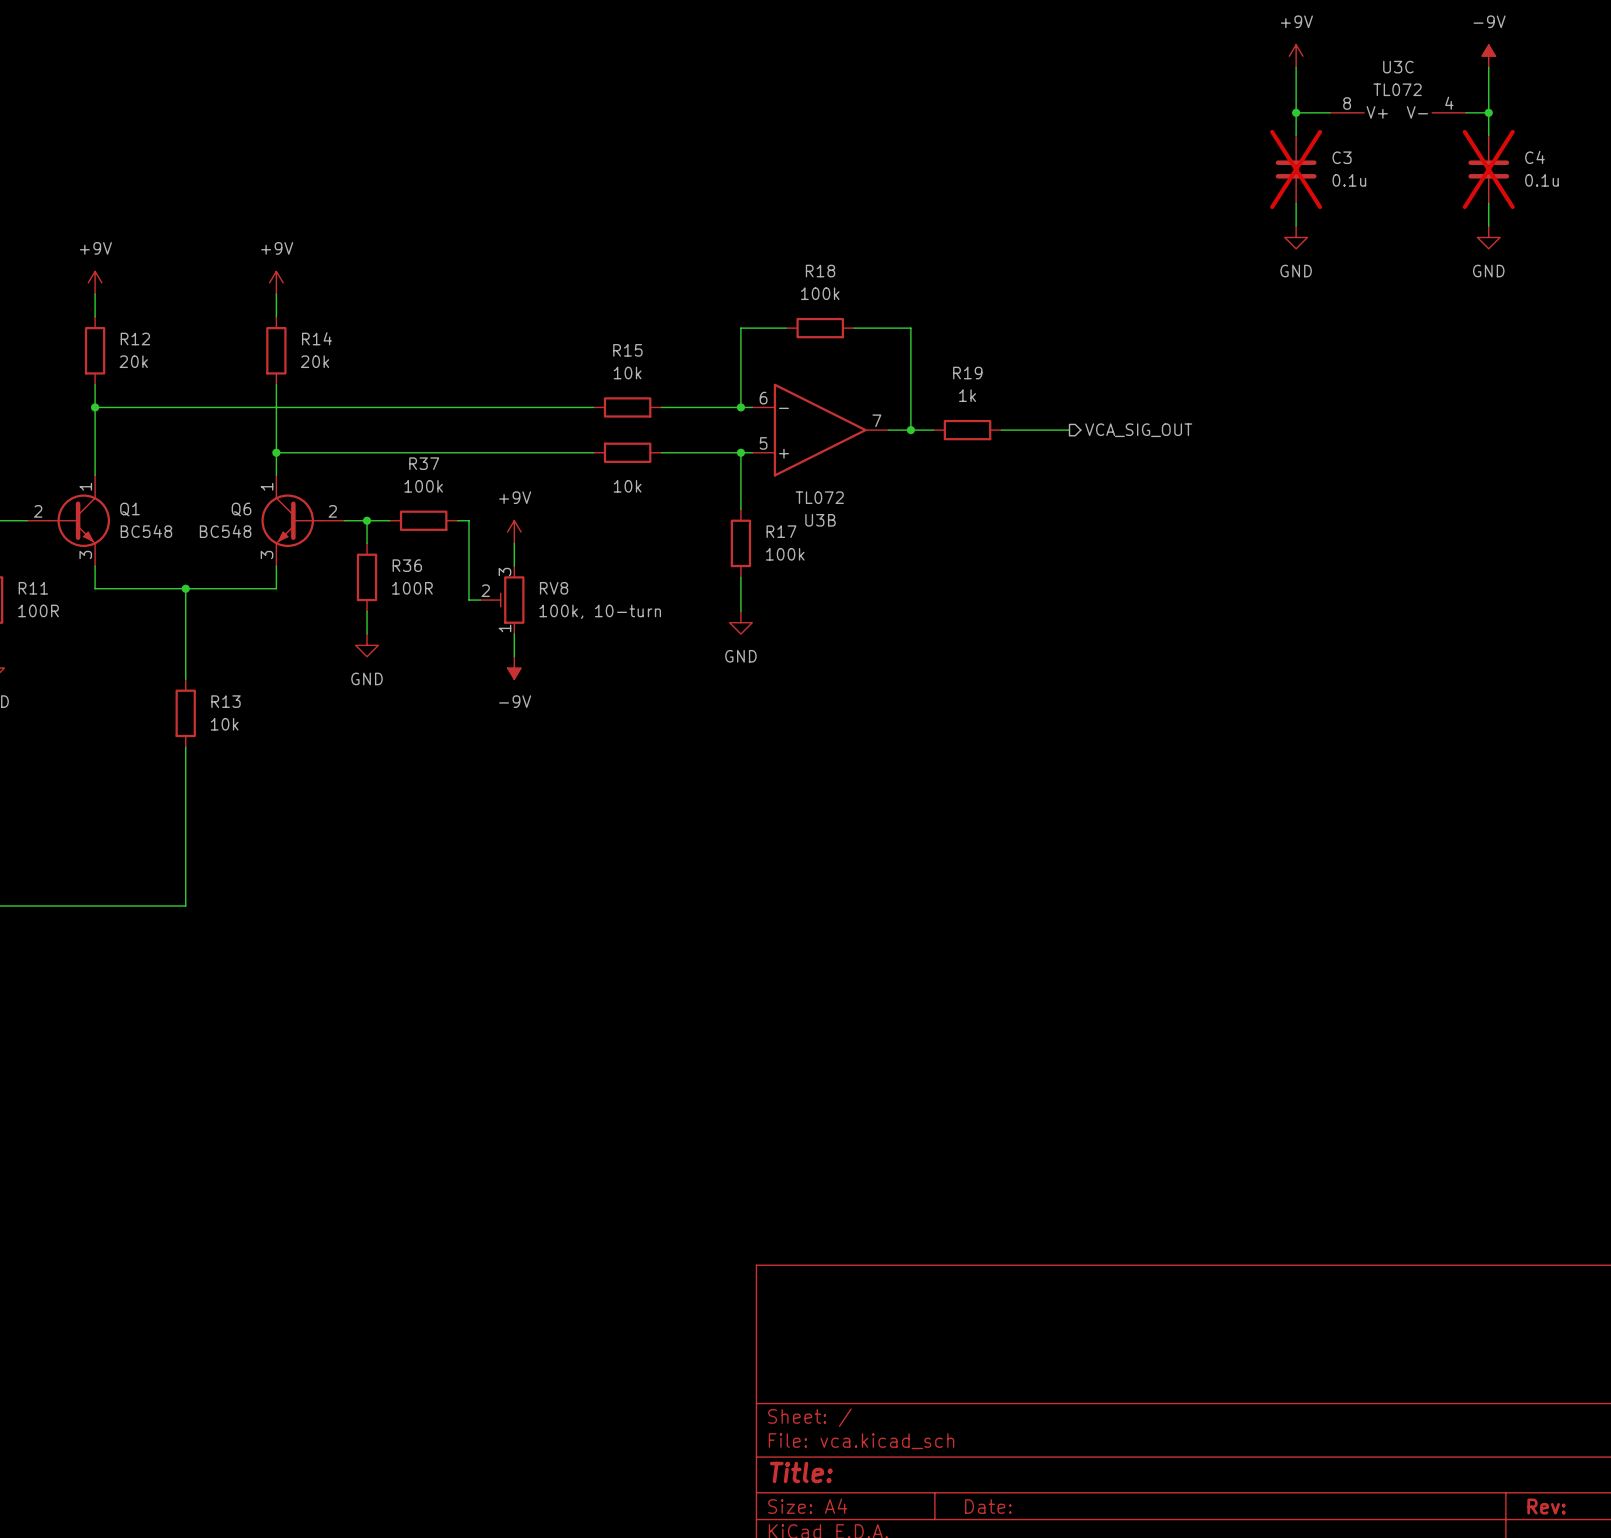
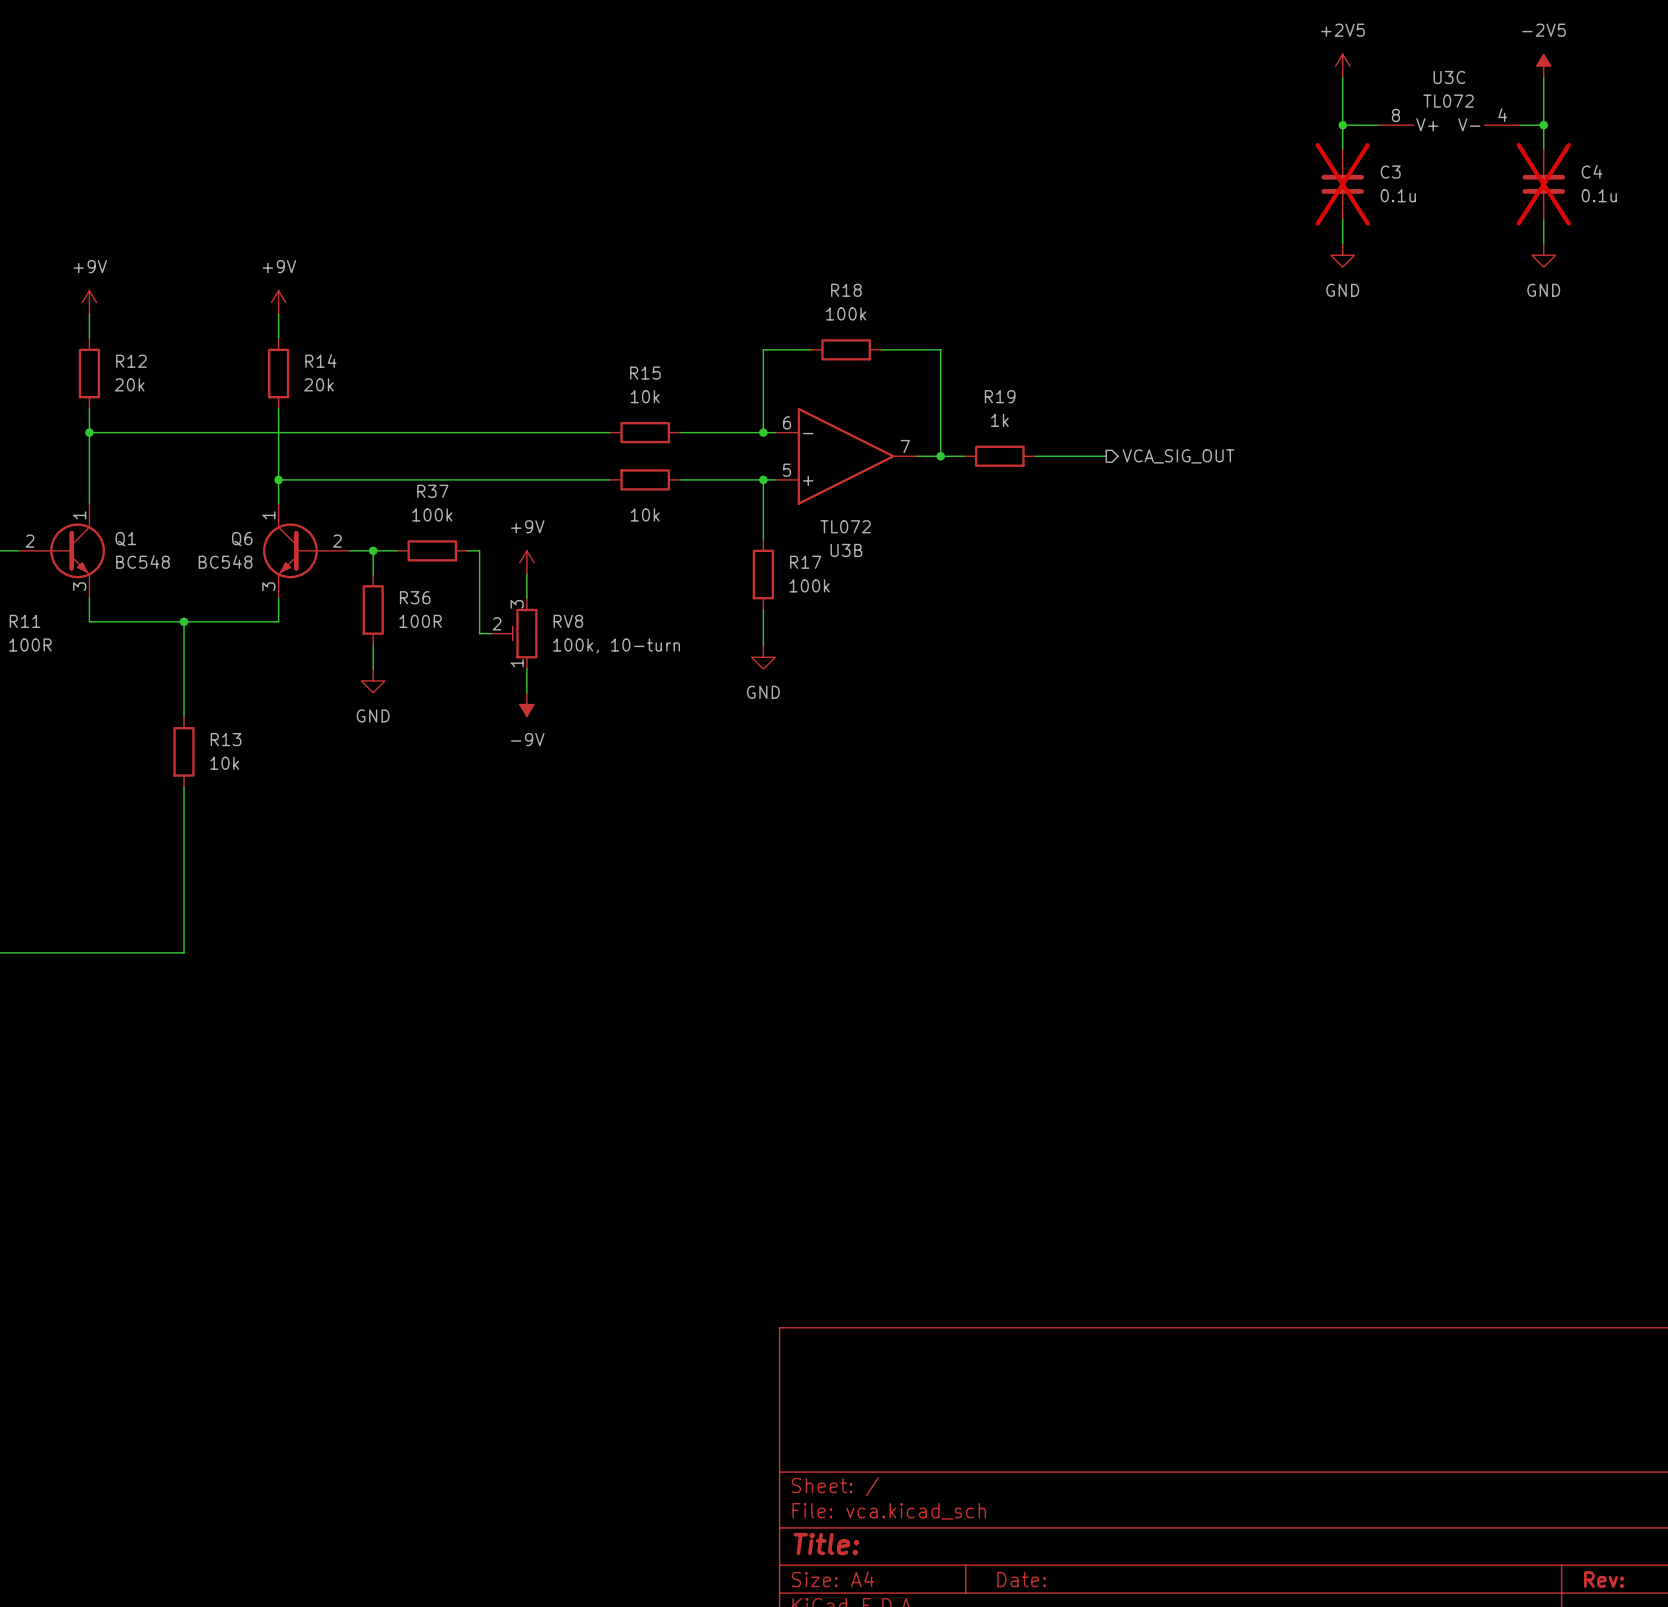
power symbol: +9V (1296, 56) -> +2V5 (1342, 66)
power symbol: -9V (1488, 56) -> -2V5 (1543, 66)

